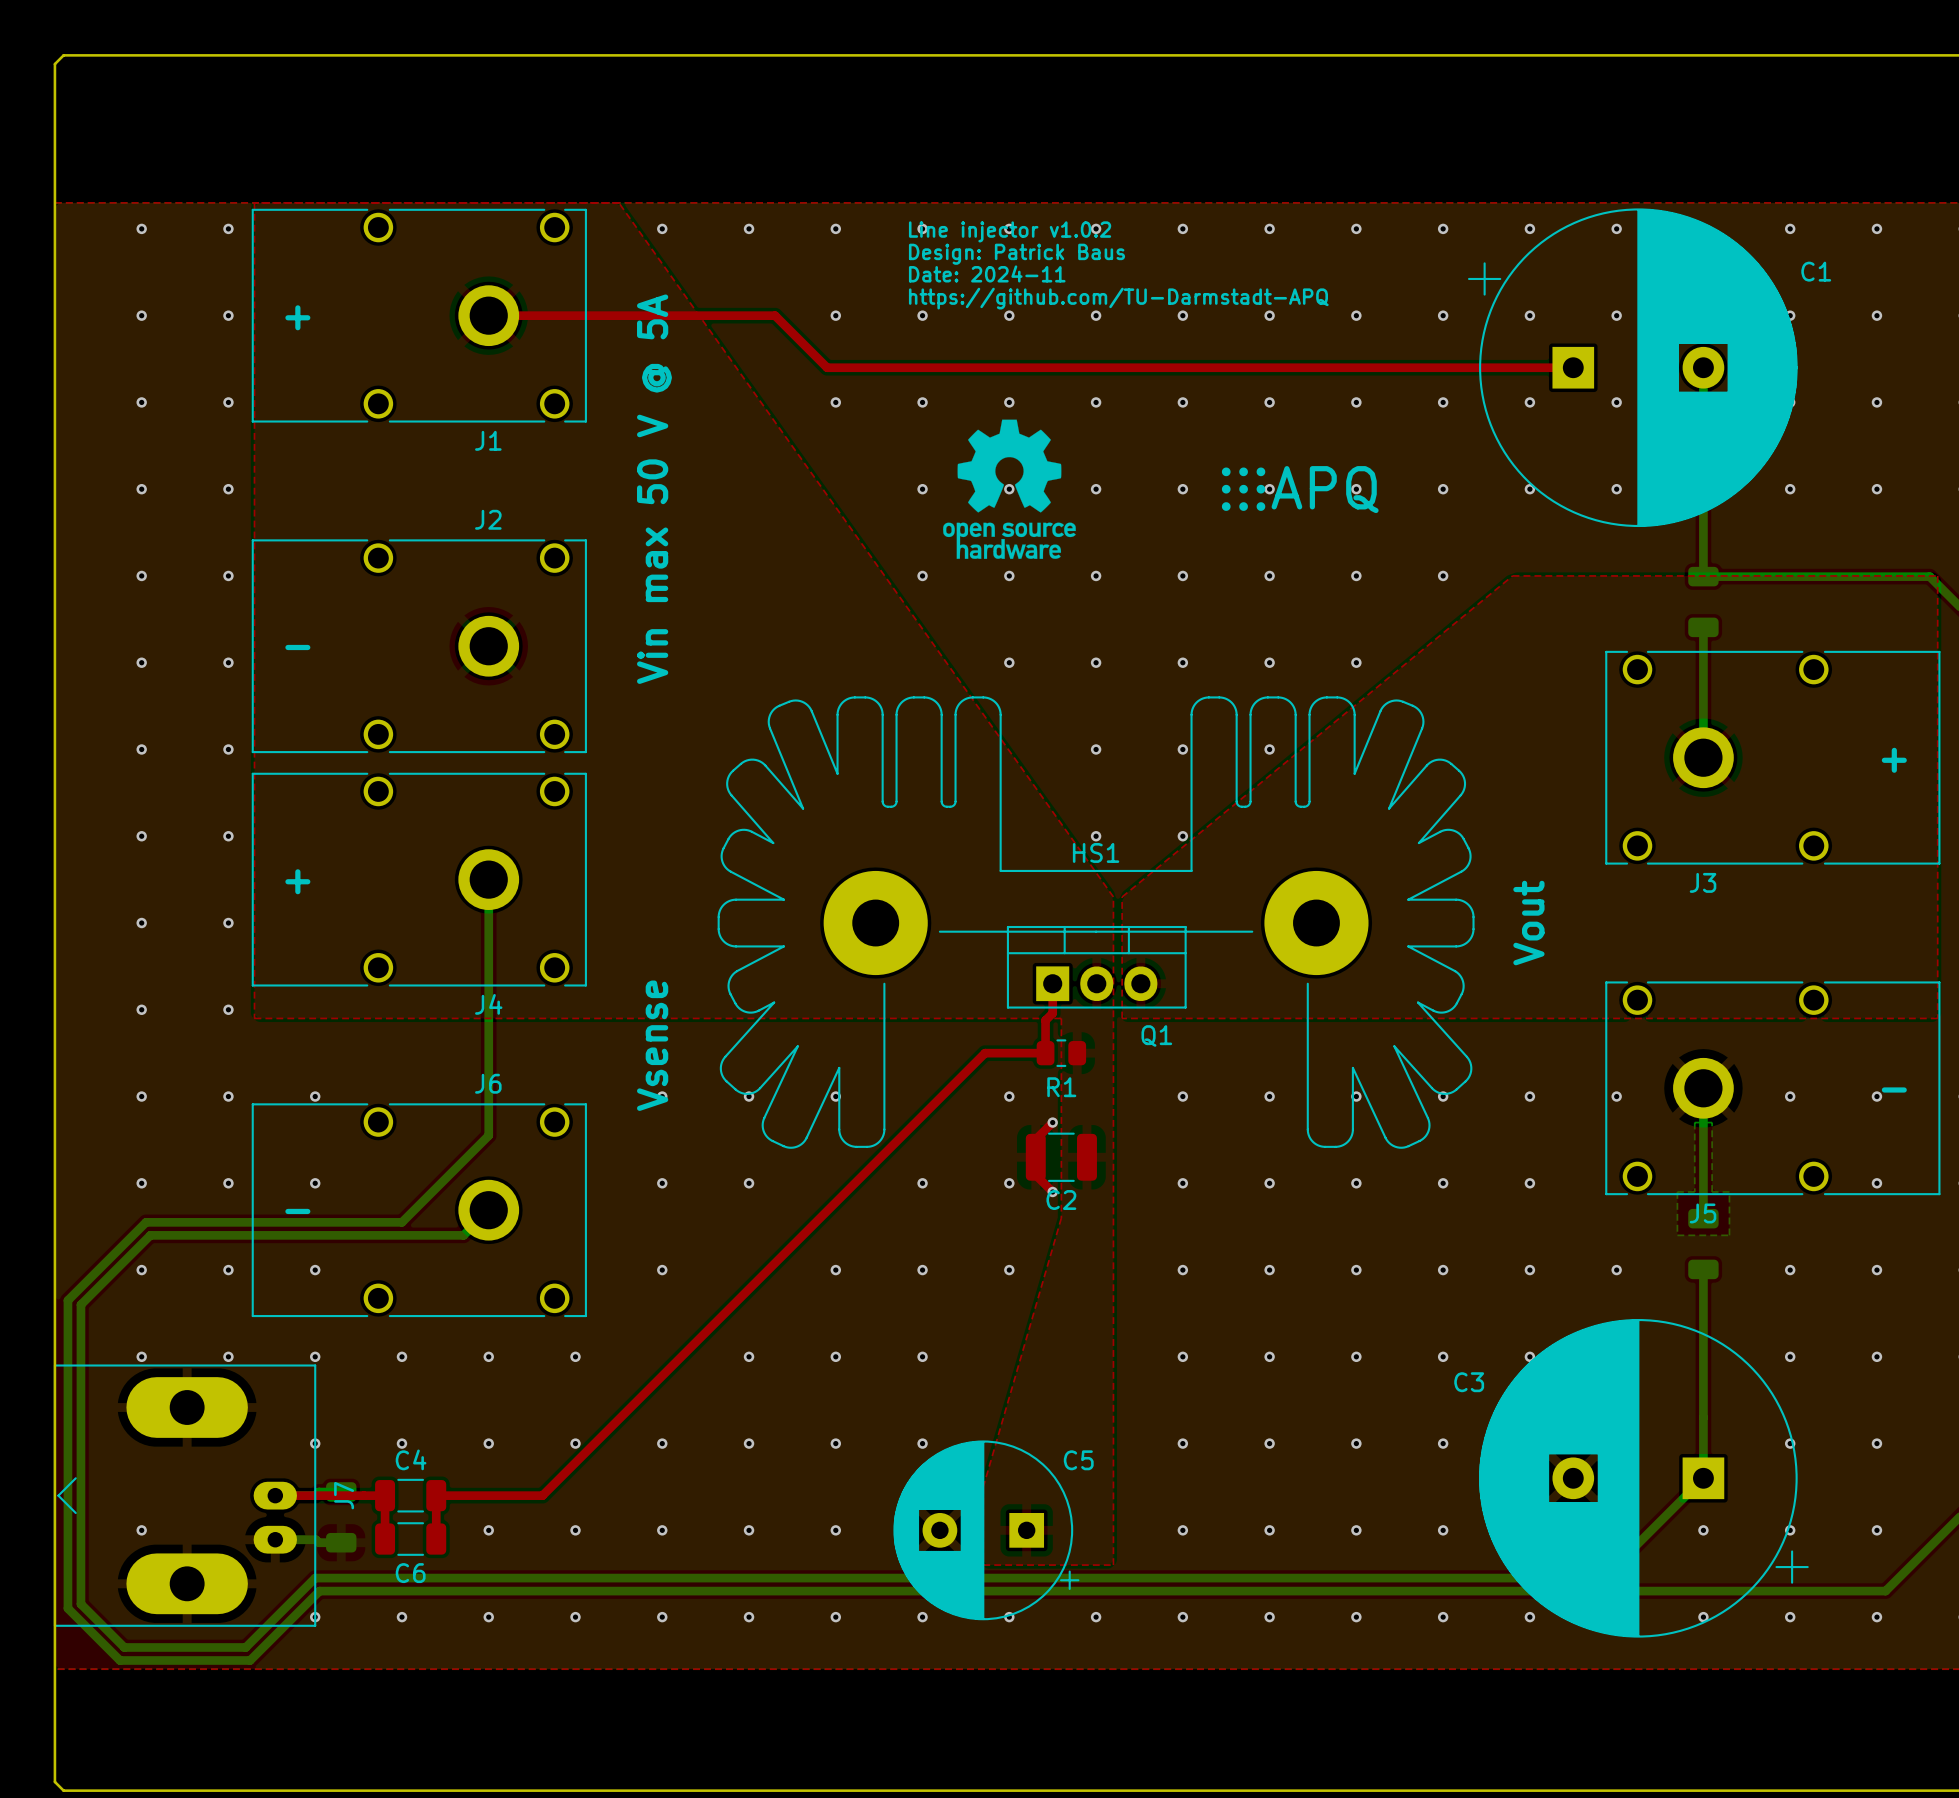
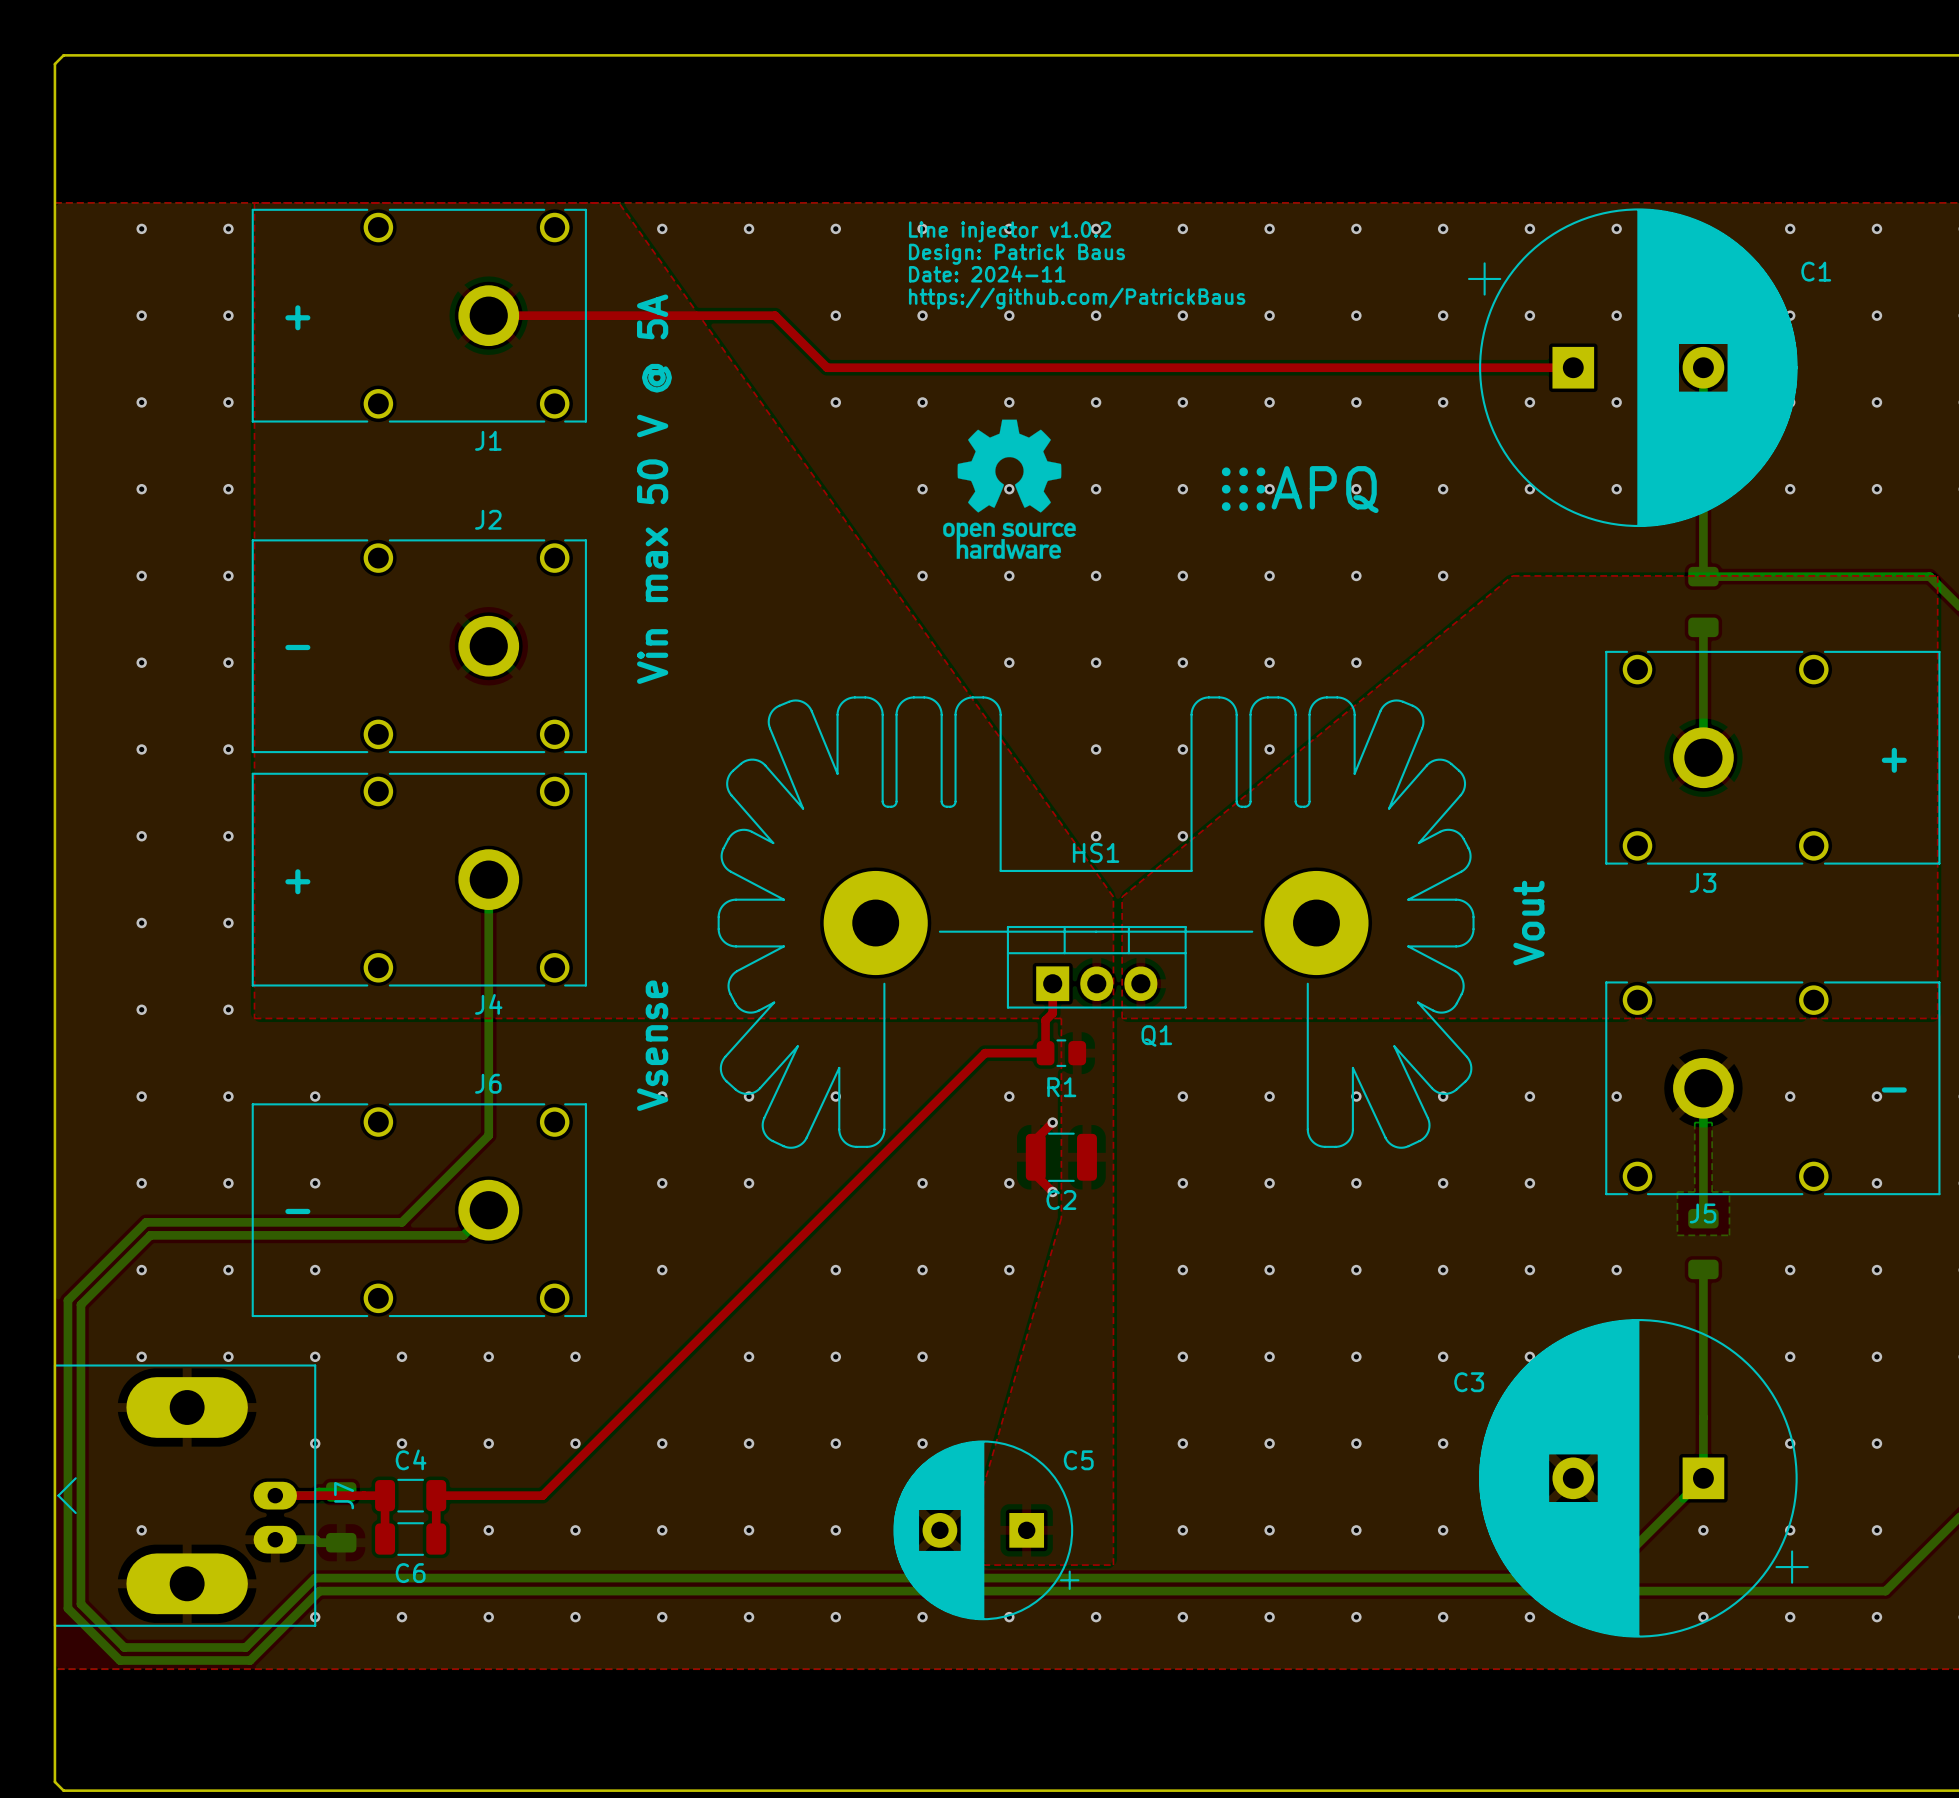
text: https://github.com/TU-Darmstadt-APQ (1118, 298) -> https://github.com/PatrickBaus (1077, 298)

